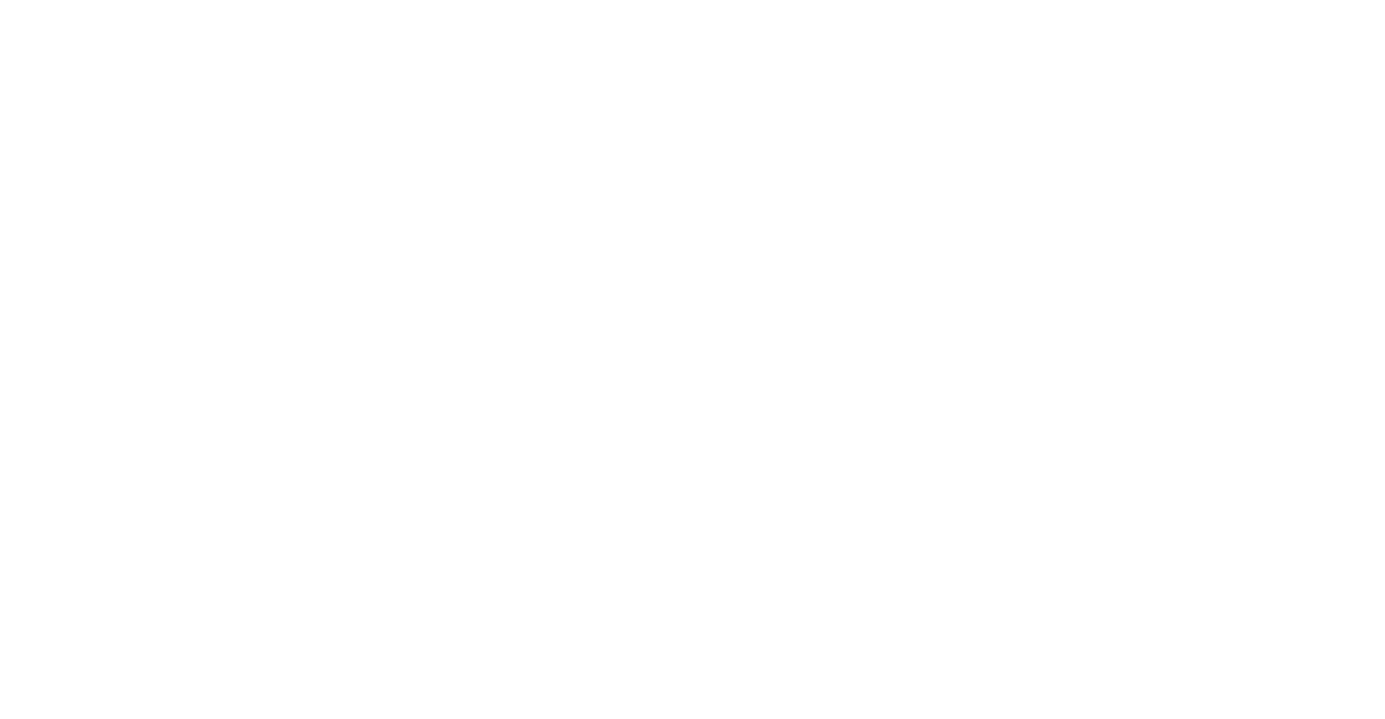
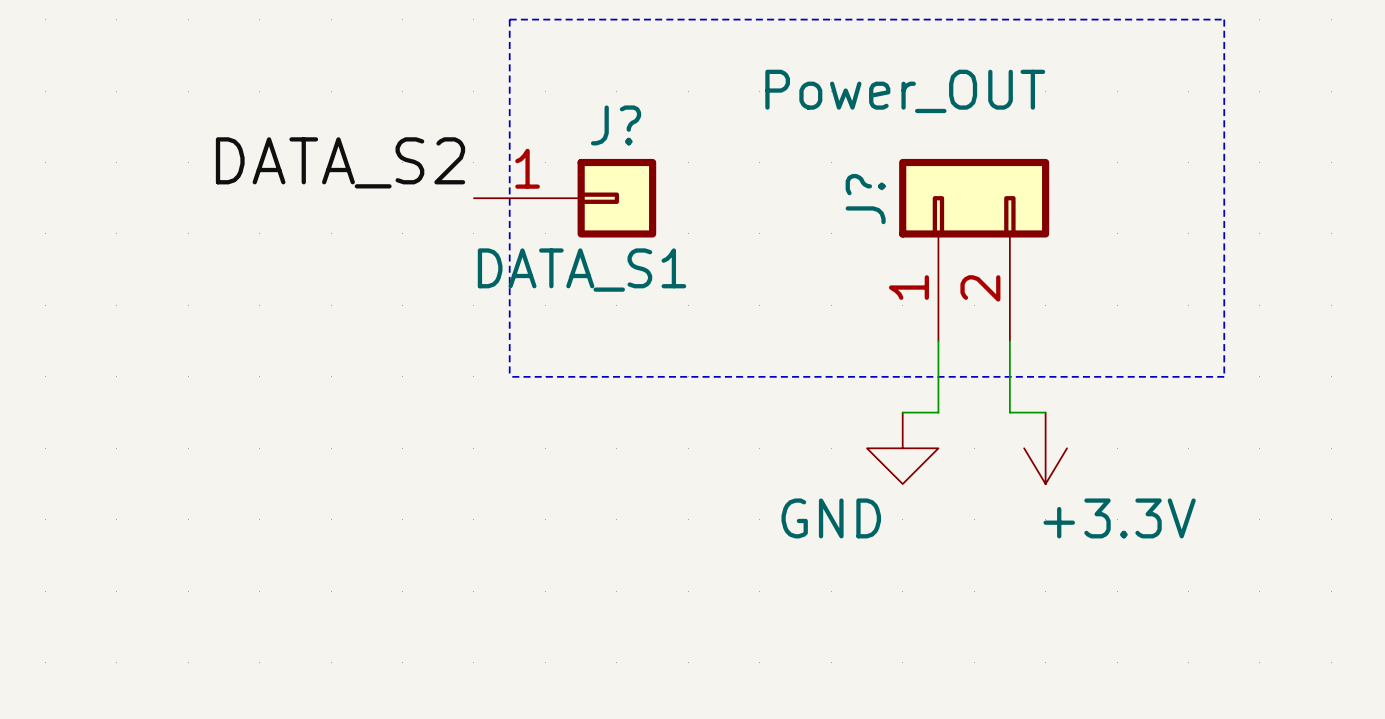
line: none -> (509, 19) (509, 376) (1224, 376) (1224, 19) (509, 19)
label: none -> DATA_S2 (340, 162)
J?: none -> DATA_S1 (565, 198)
J?: none -> Power_OUT (974, 250)
wire: none -> (938, 341) (938, 412) (902, 412)
wire: none -> (1009, 341) (1009, 412) (1045, 412)
power symbol: none -> GND (902, 448)
power symbol: none -> +3.3V (1045, 448)

